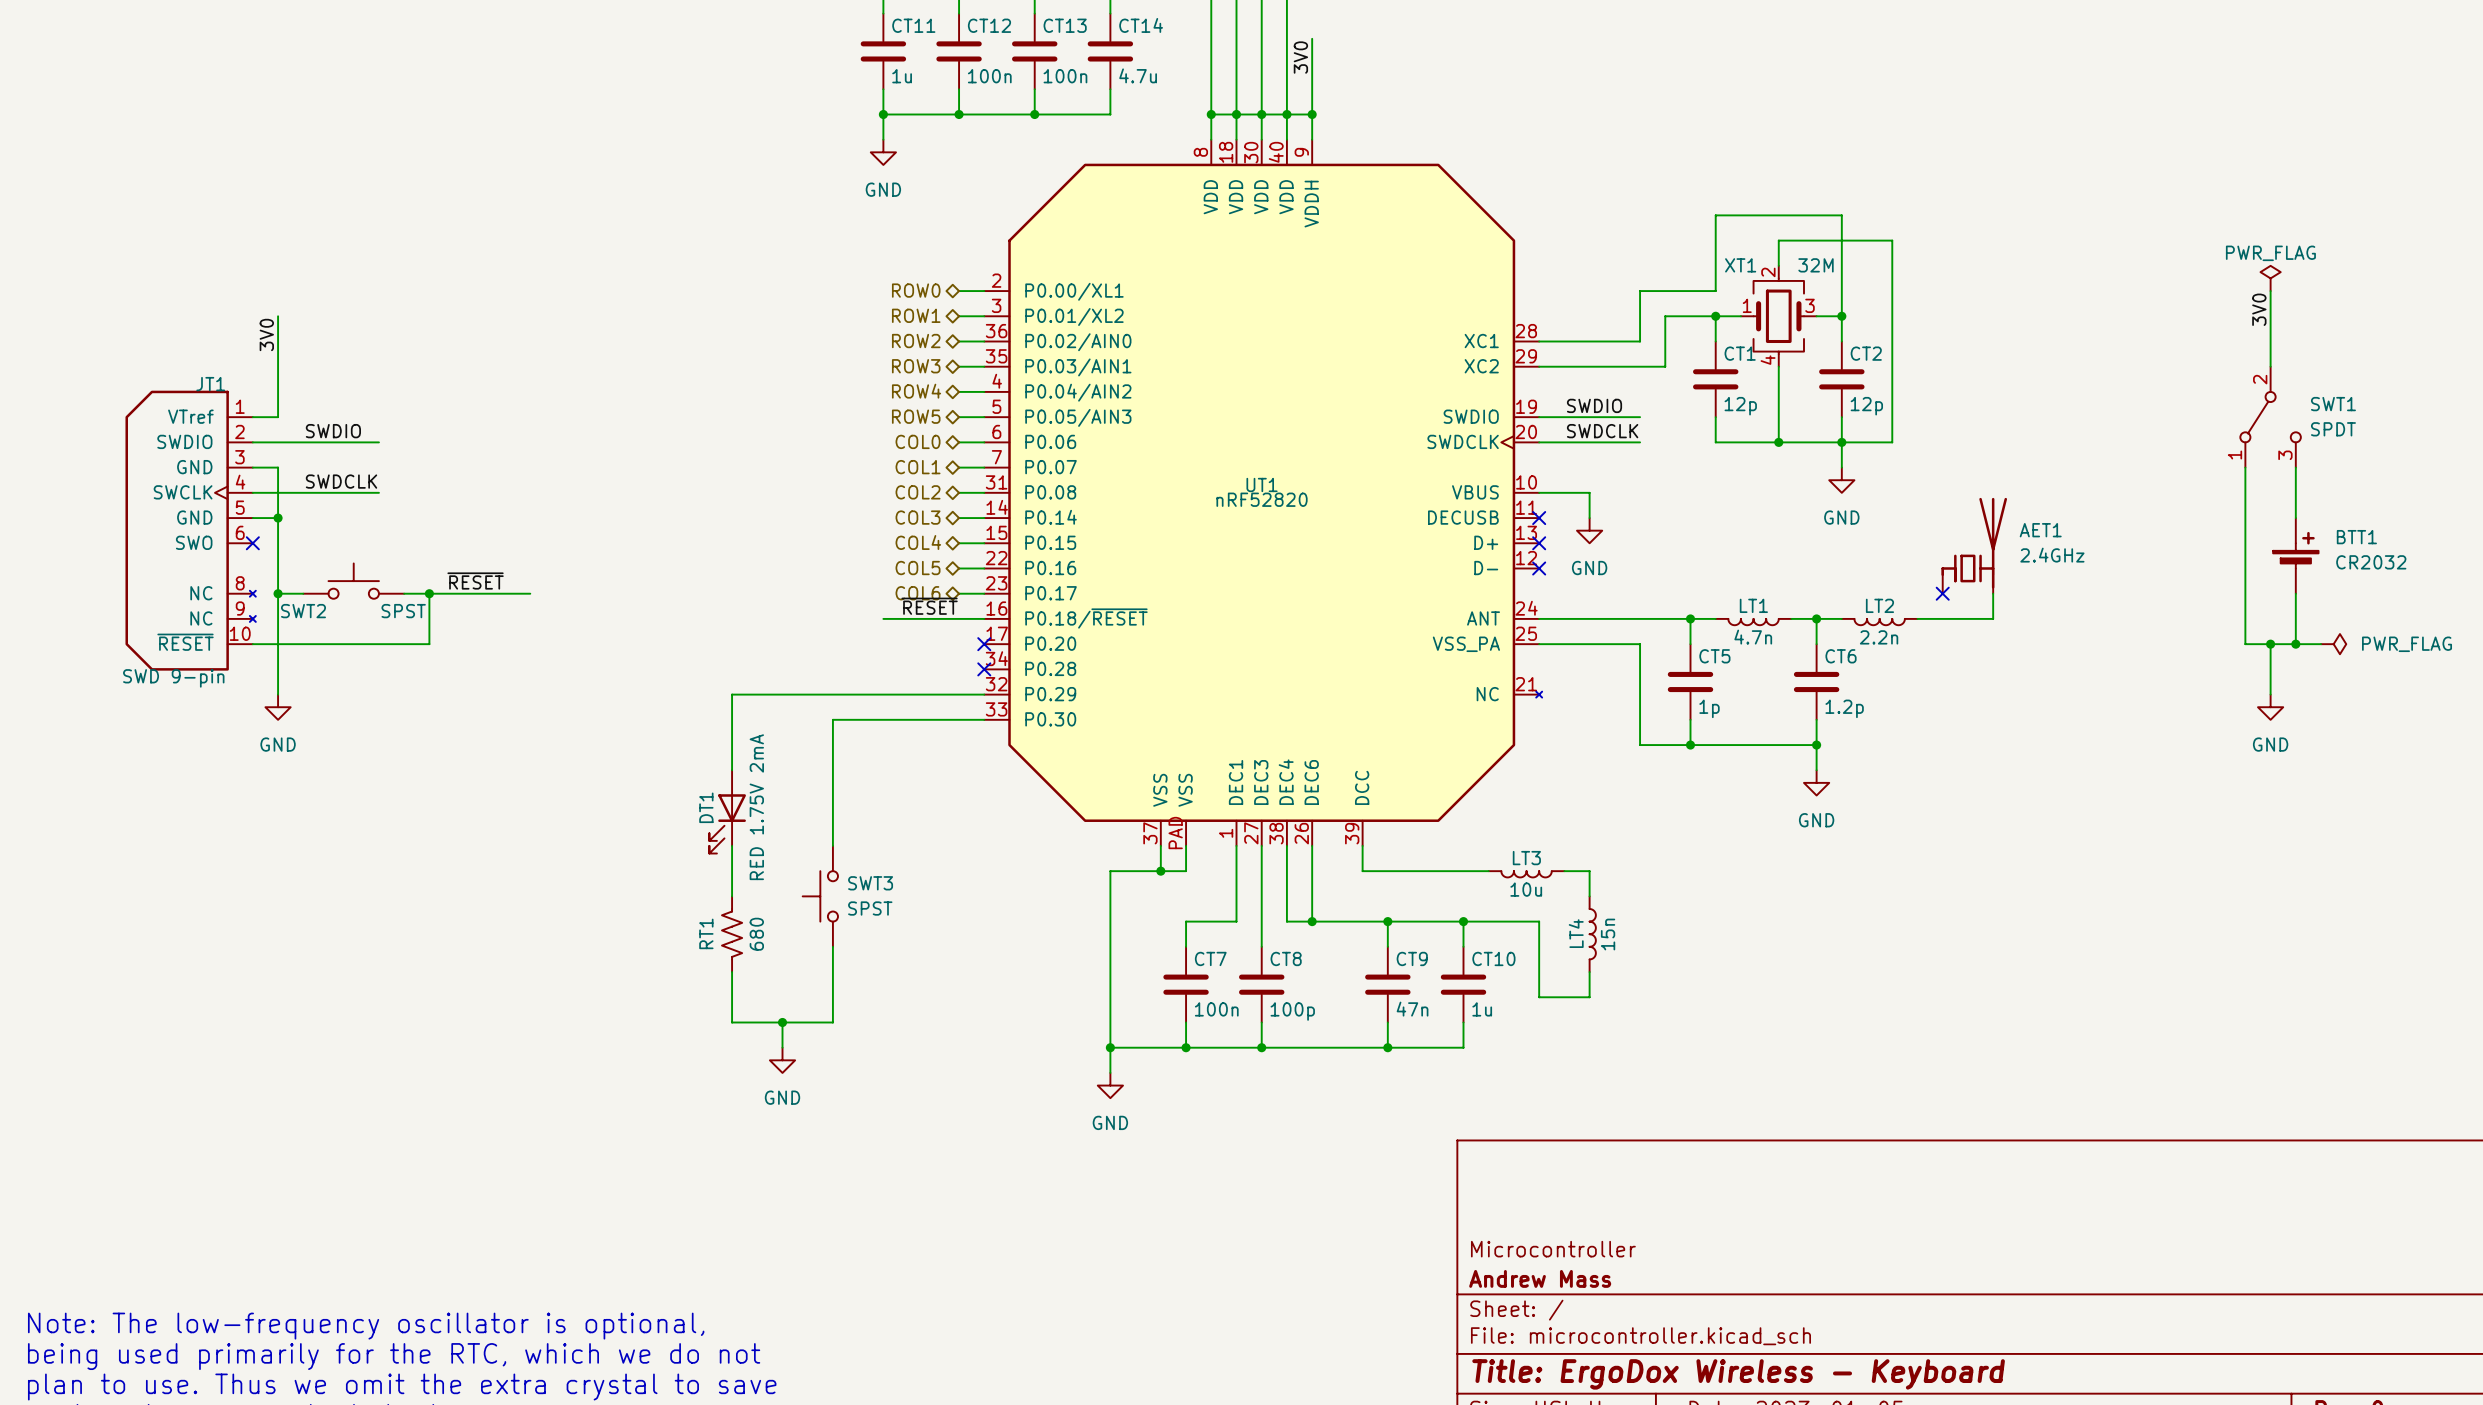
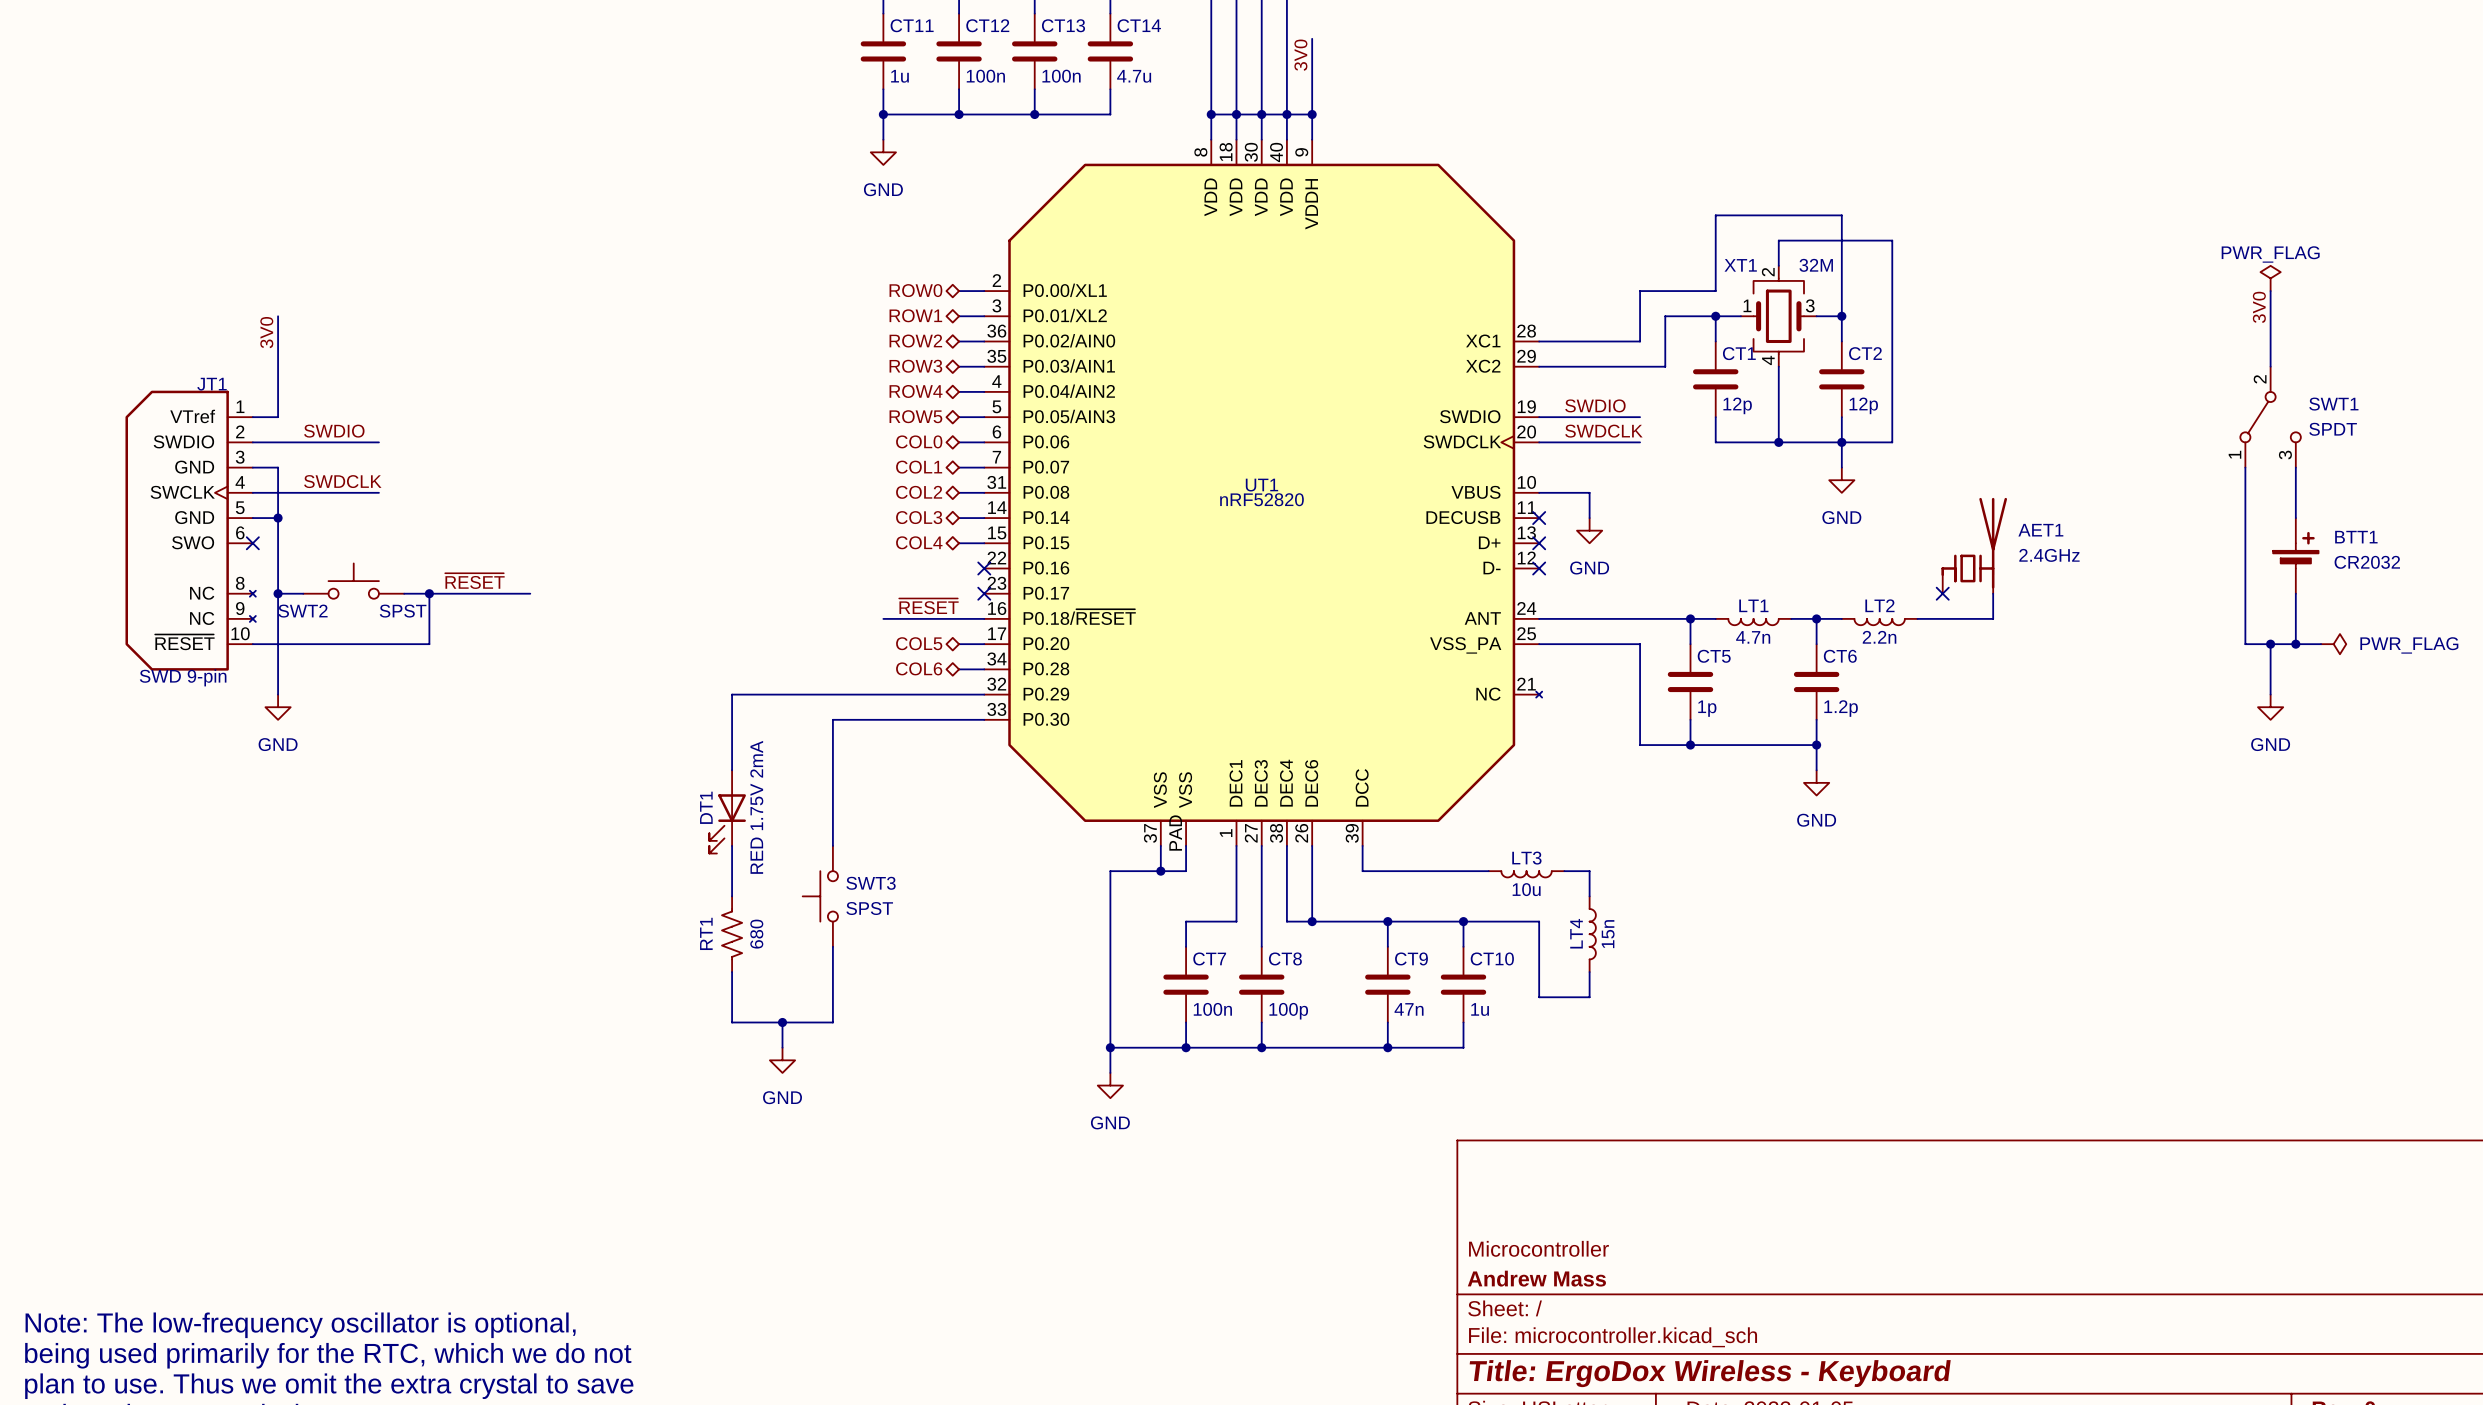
hierarchical label position: COL5 (918, 568) -> COL5 (919, 643)
wire: (959, 568) (984, 568) -> (959, 644) (984, 644)
no-connect mark: none -> (984, 568)
hierarchical label position: COL6 (918, 593) -> COL6 (919, 668)
wire: (959, 593) (984, 593) -> (959, 669) (984, 669)
no-connect mark: none -> (984, 593)
no-connect mark: (984, 644) -> none
no-connect mark: (984, 669) -> none

